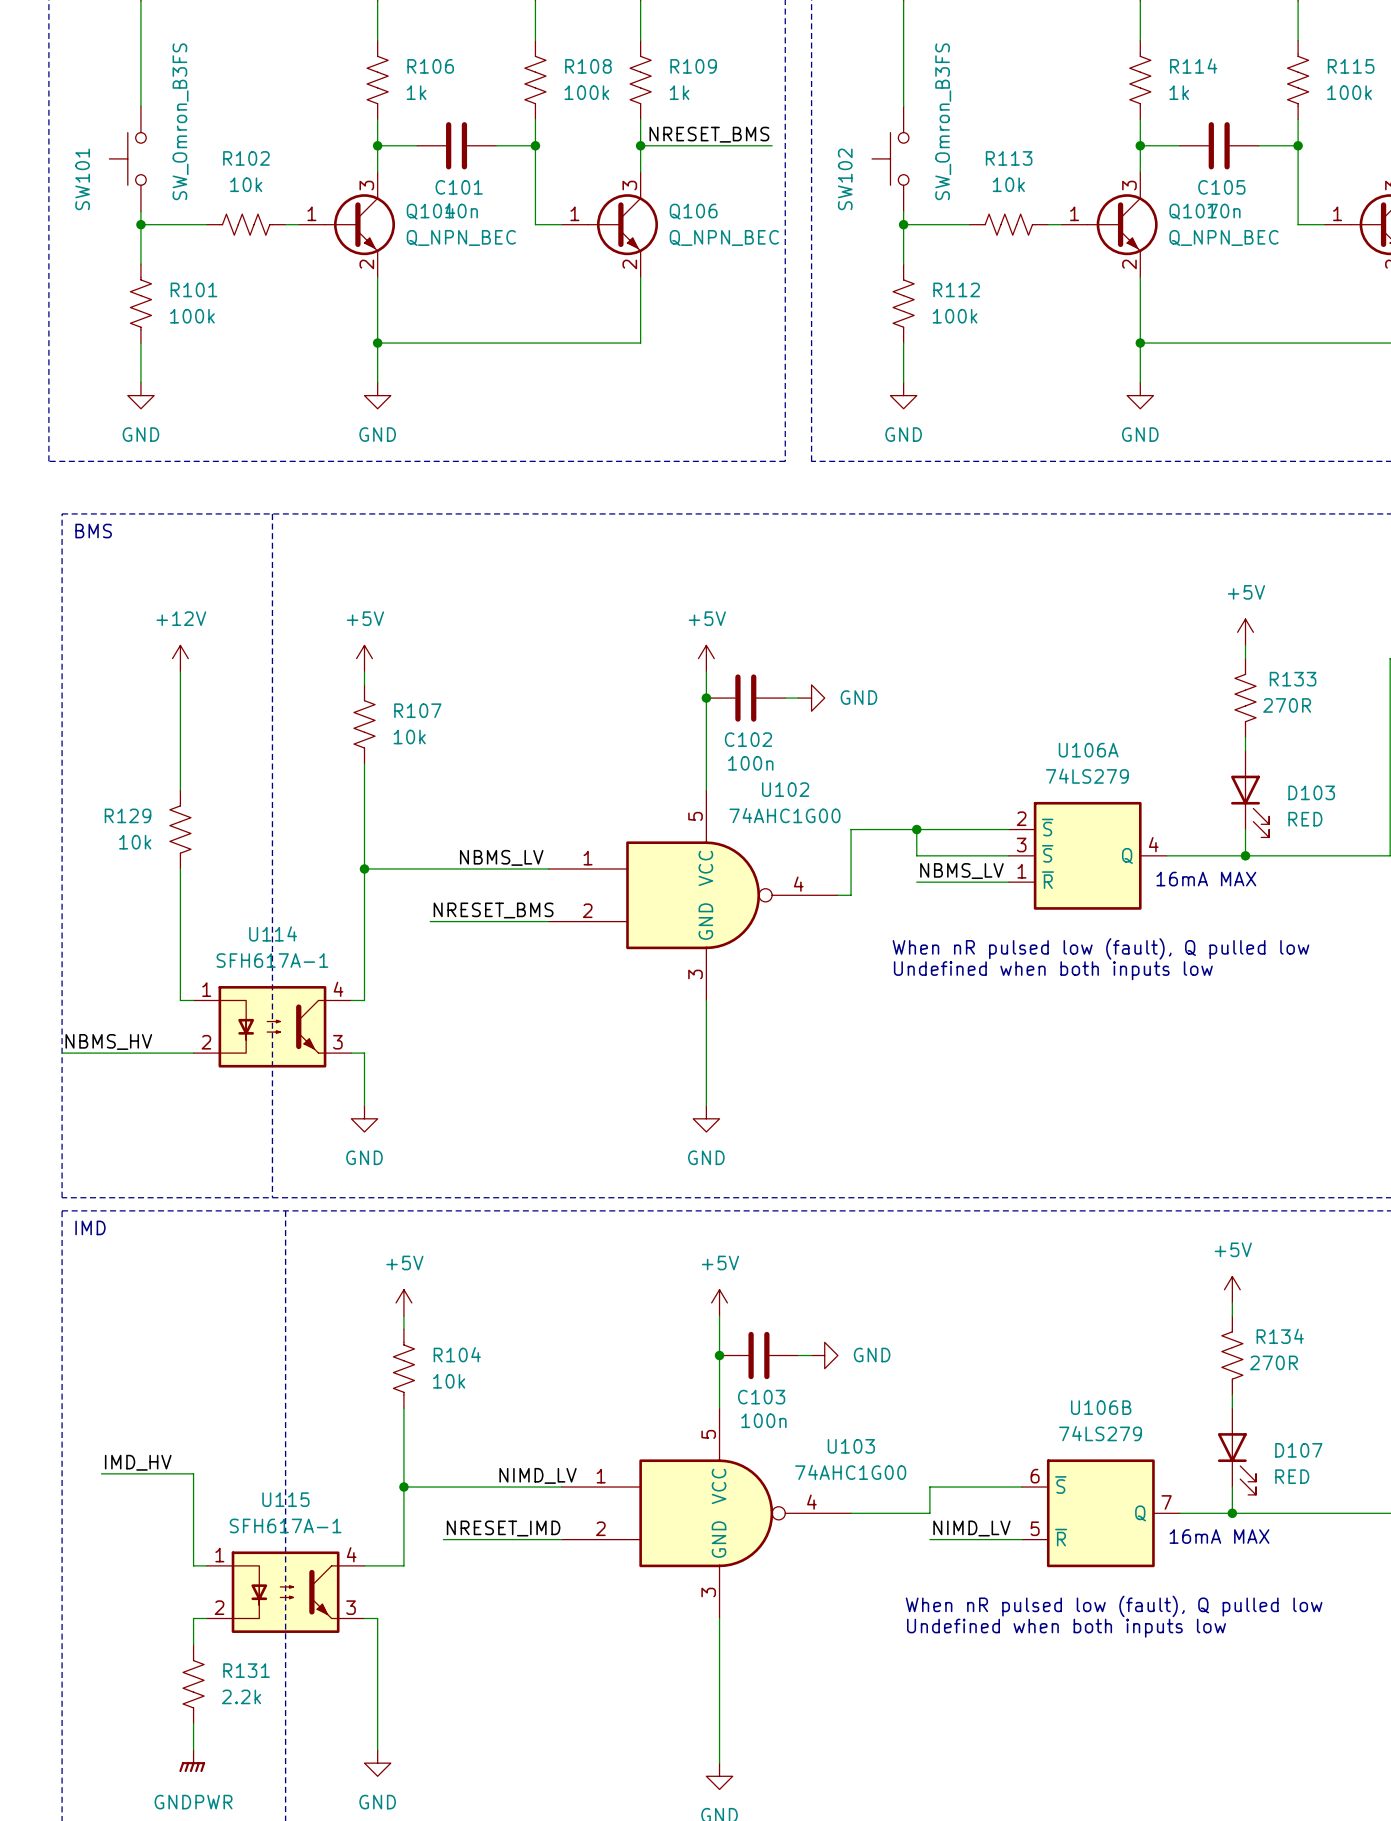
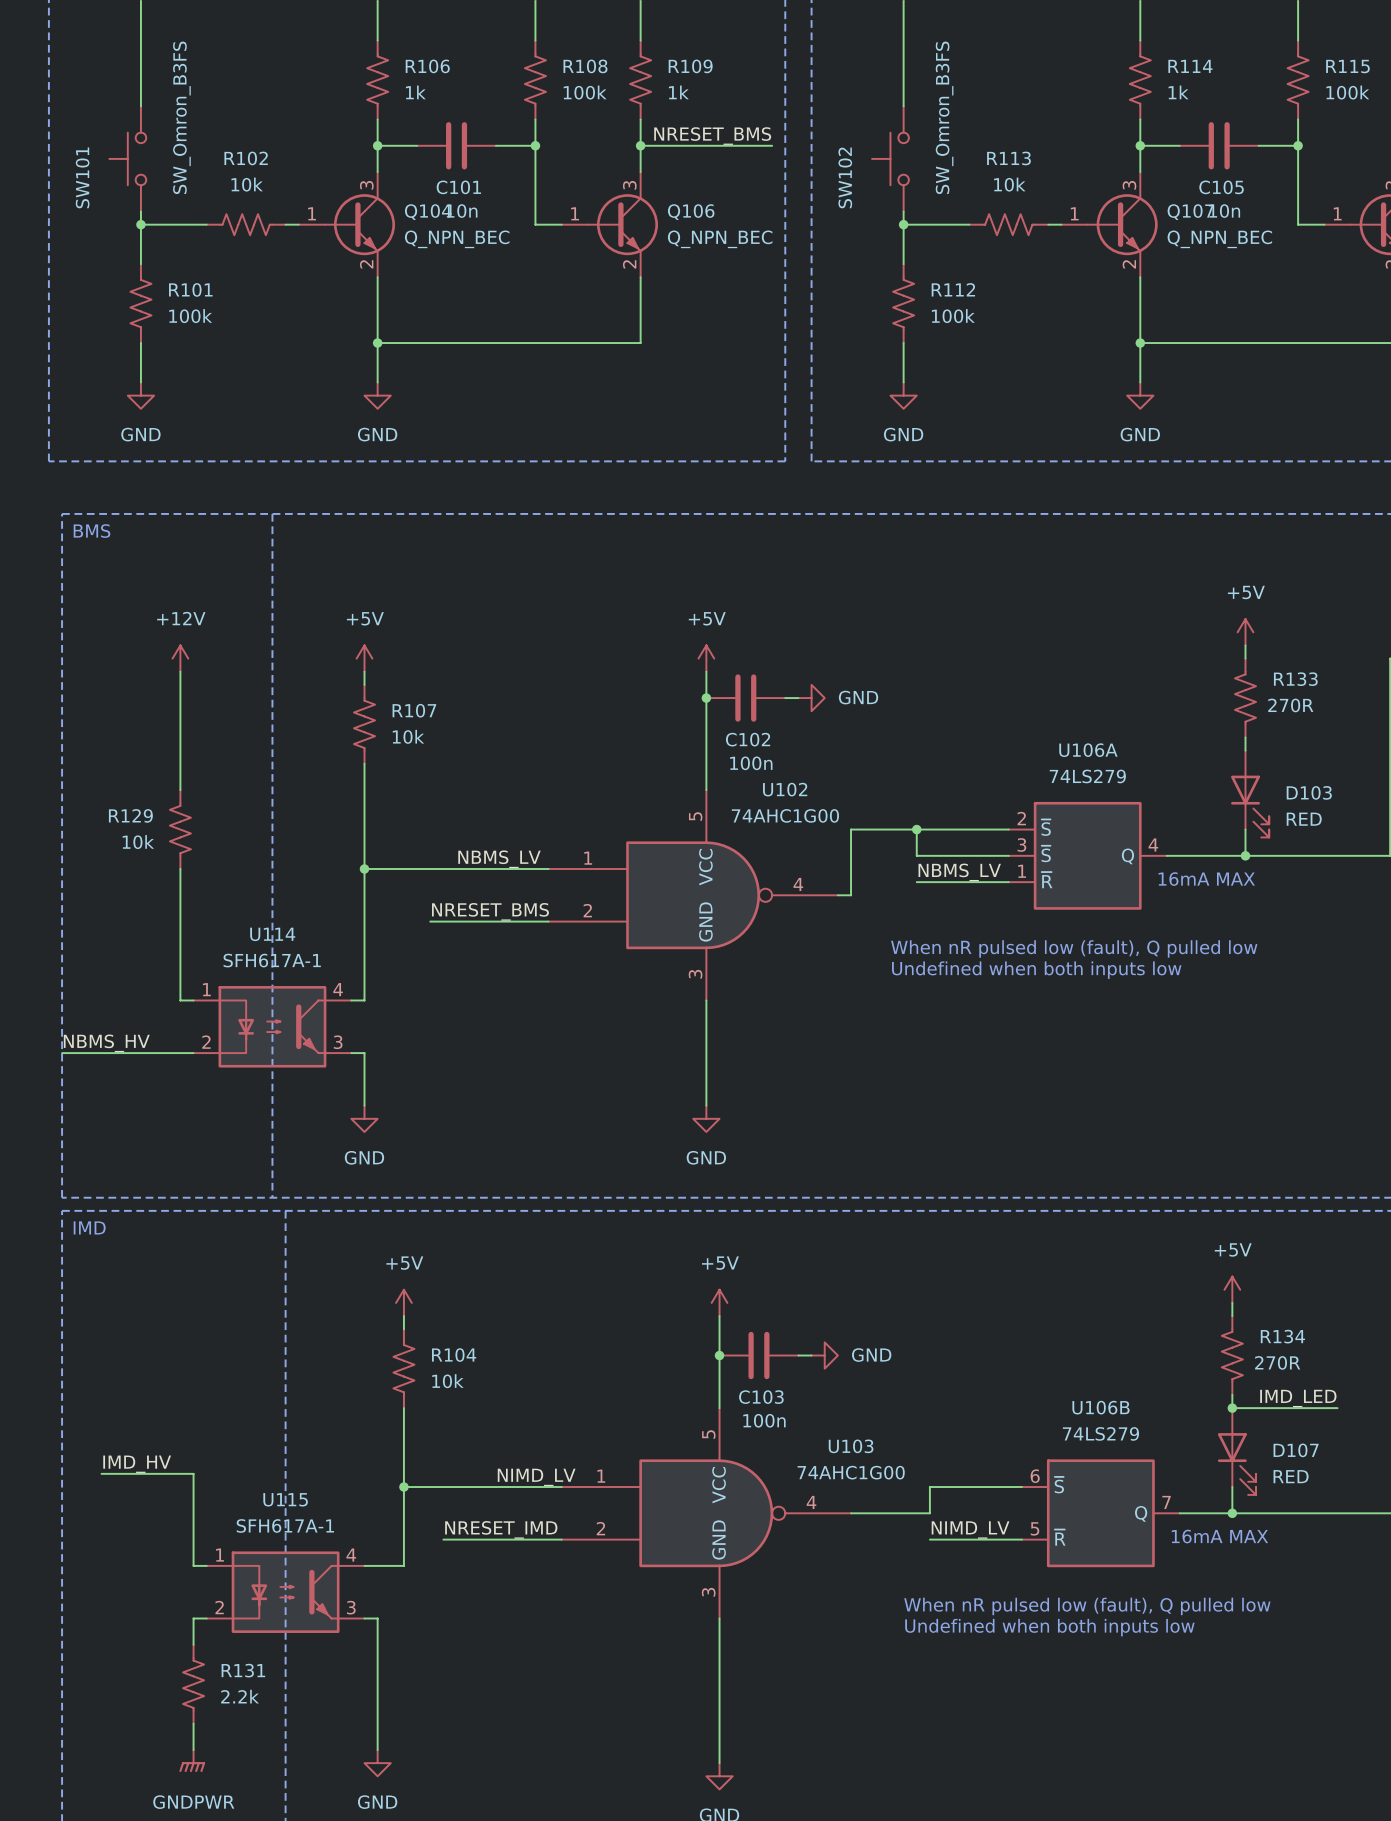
label: none -> IMD_LED (1298, 1398)
wire: none -> (1232, 1408) (1337, 1408)
junction: none -> (1232, 1408)

